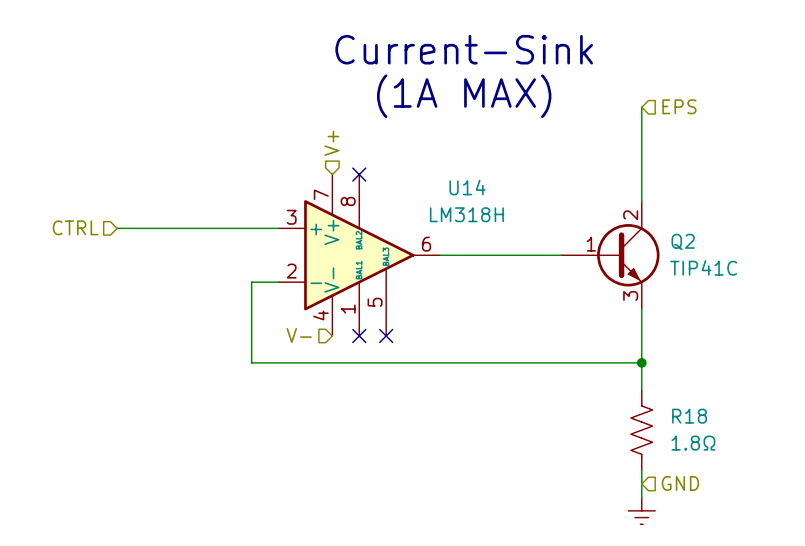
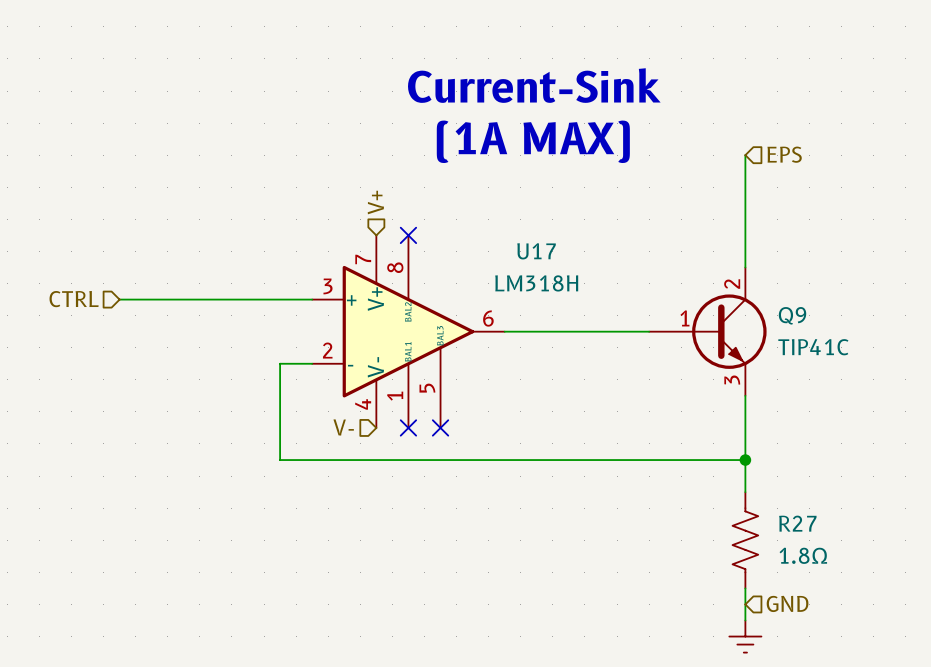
U14 name: U14 (467, 187) -> U17 (536, 251)
Q2 name: Q2 (683, 241) -> Q9 (792, 315)
R18 name: R18 (689, 416) -> R27 (797, 523)

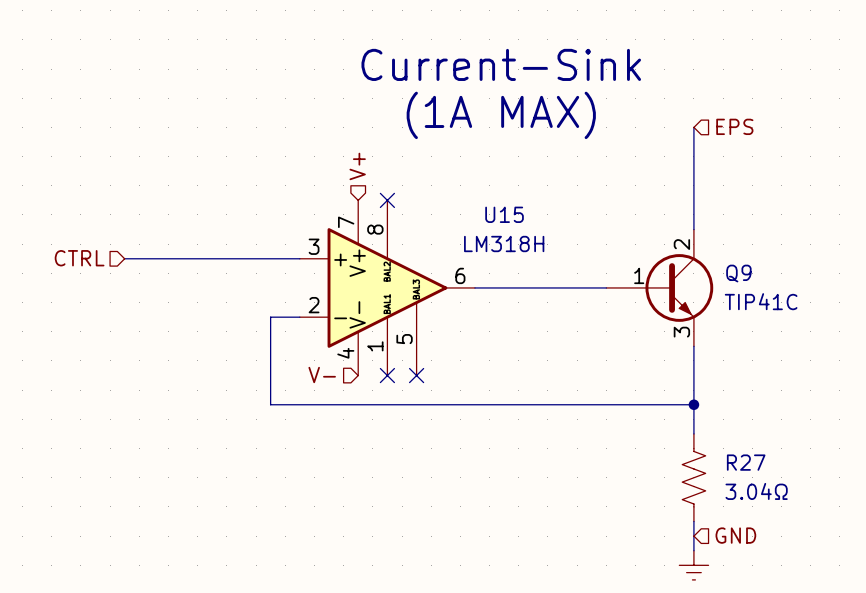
U17 name: U17 (536, 251) -> U15 (504, 214)
R27 value: 1.8Ω (803, 555) -> 3.04Ω (756, 491)

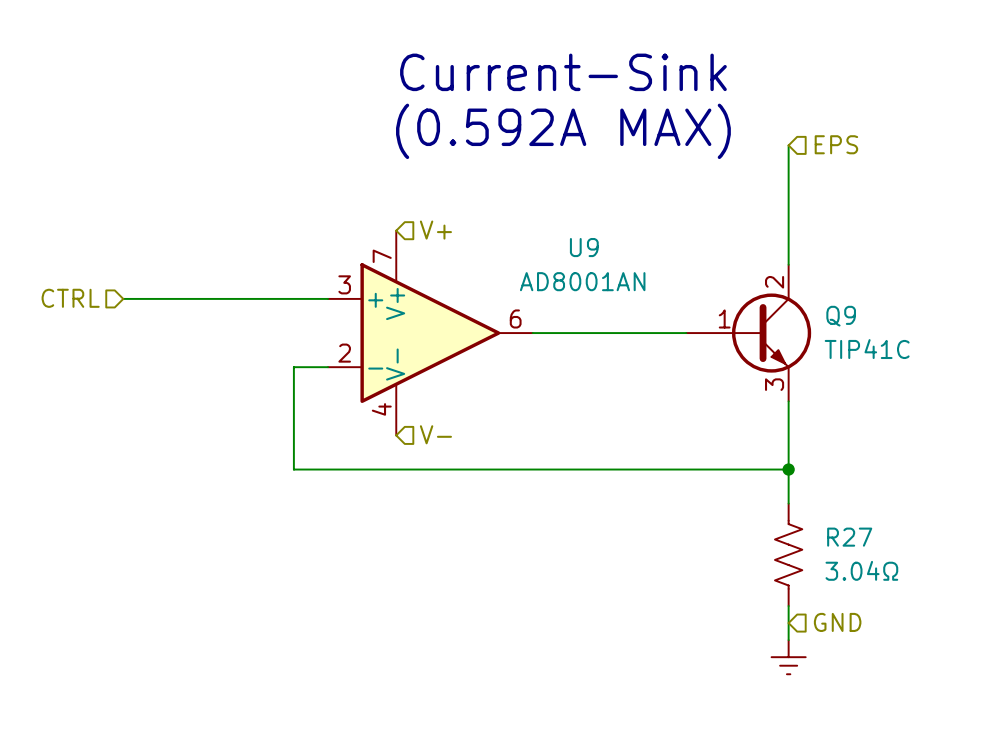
text: (1A MAX) (501, 115) -> (0.592A MAX) (563, 131)
hierarchical label rotation: 0° (357, 166) -> 90° clockwise (435, 230)
hierarchical label position: V+ (357, 166) -> V+ (435, 230)
no-connect mark: (387, 200) -> none
U15: LM318H (387, 287) -> none
U9: none -> AD8001AN (430, 333)
hierarchical label rotation: 0° (322, 375) -> 180° (435, 434)
hierarchical label position: V- (322, 375) -> V- (435, 434)
no-connect mark: (387, 375) -> none
no-connect mark: (416, 375) -> none

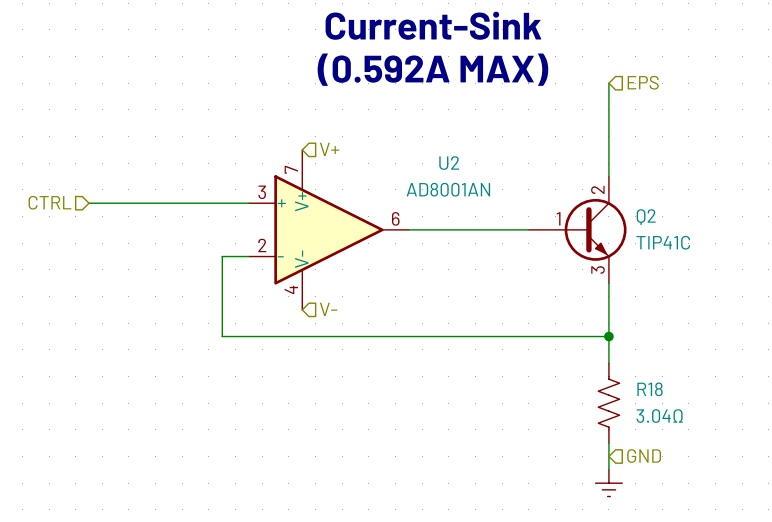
U9 name: U9 (584, 247) -> U2 (449, 163)
Q9 name: Q9 (841, 316) -> Q2 (646, 217)
R27 name: R27 (849, 537) -> R18 (650, 389)

